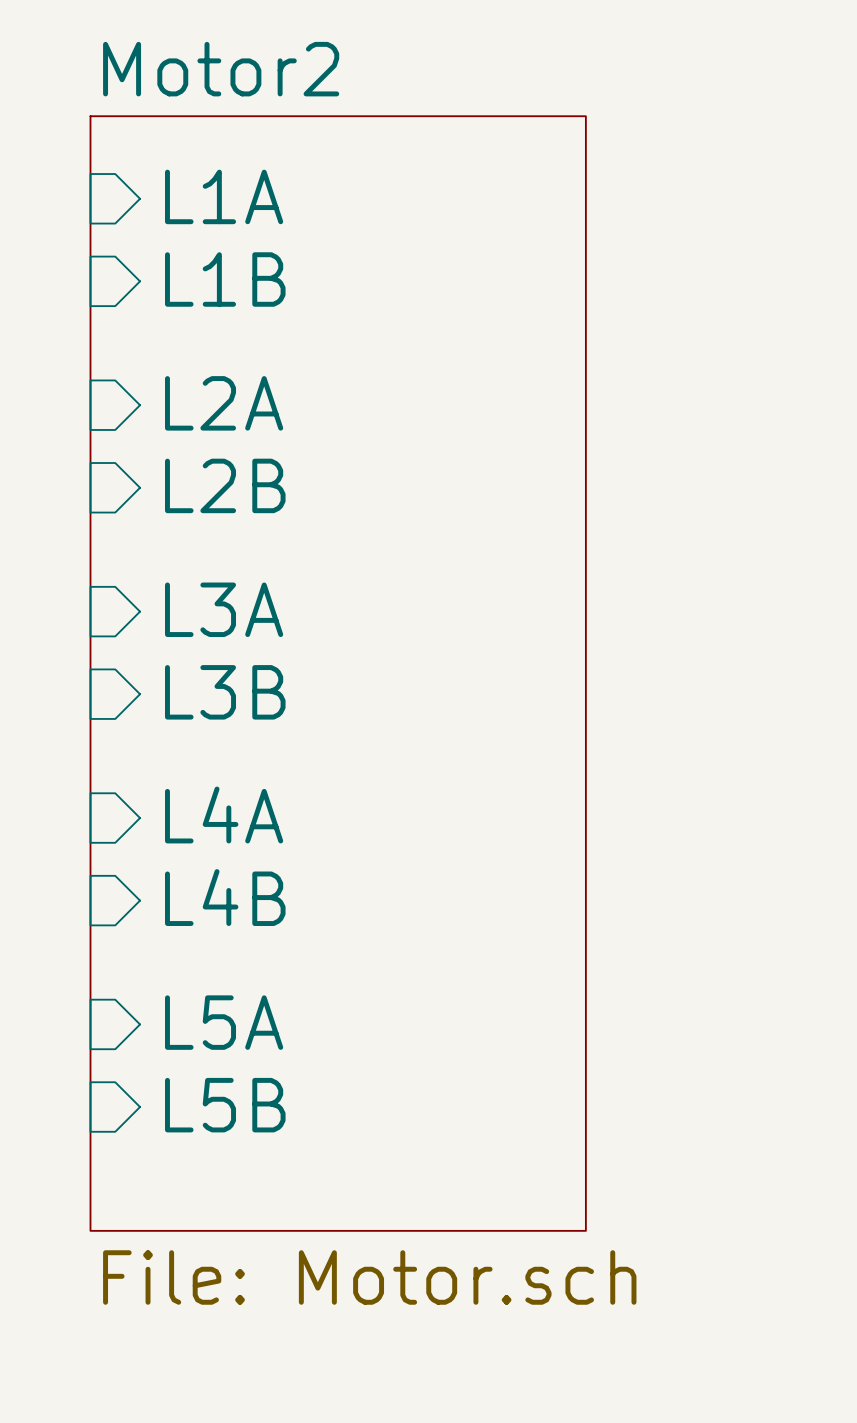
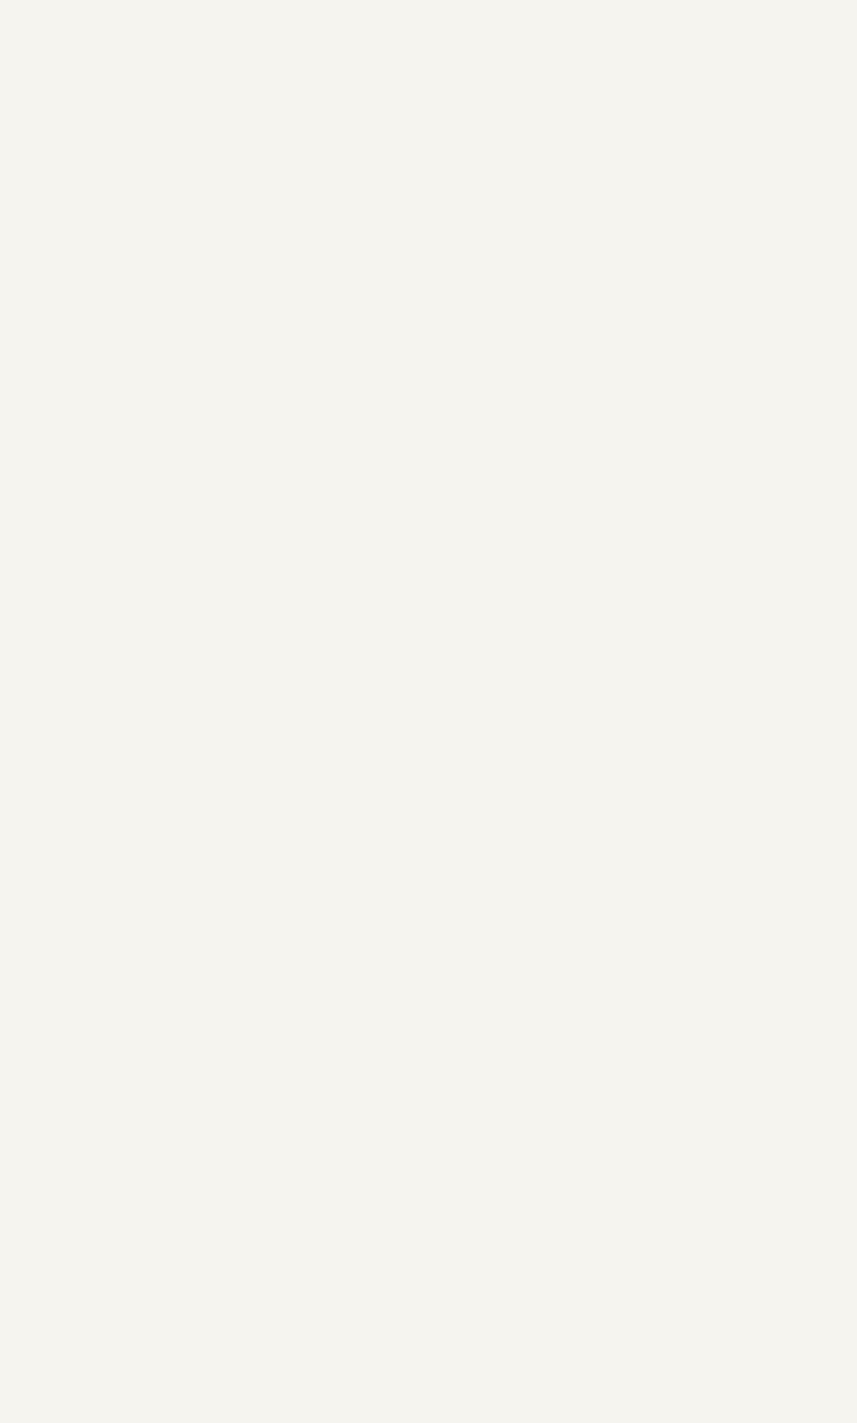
sheet pin: L1A (224, 196) -> none
sheet pin: L1B (225, 279) -> none
sheet pin: L2A (224, 403) -> none
sheet pin: L2B (225, 485) -> none
sheet pin: L3A (224, 609) -> none
sheet Motor2: File: Motor.sch (338, 673) -> none
sheet pin: L3B (225, 692) -> none
sheet pin: L4A (224, 815) -> none
sheet pin: L4B (225, 897) -> none
sheet pin: L5A (224, 1022) -> none
sheet pin: L5B (225, 1105) -> none

